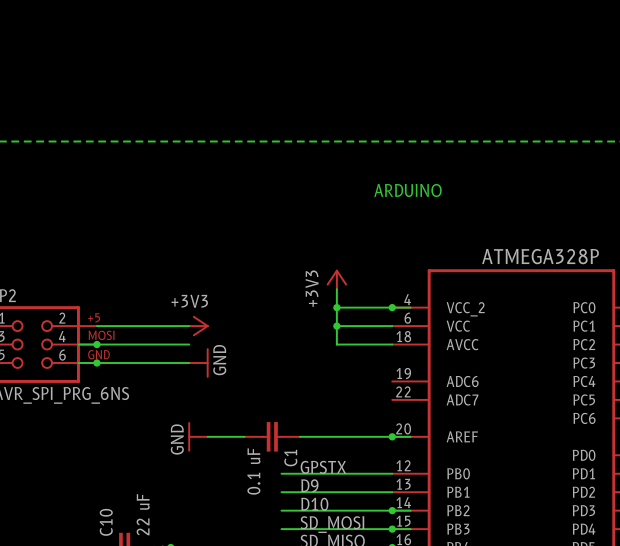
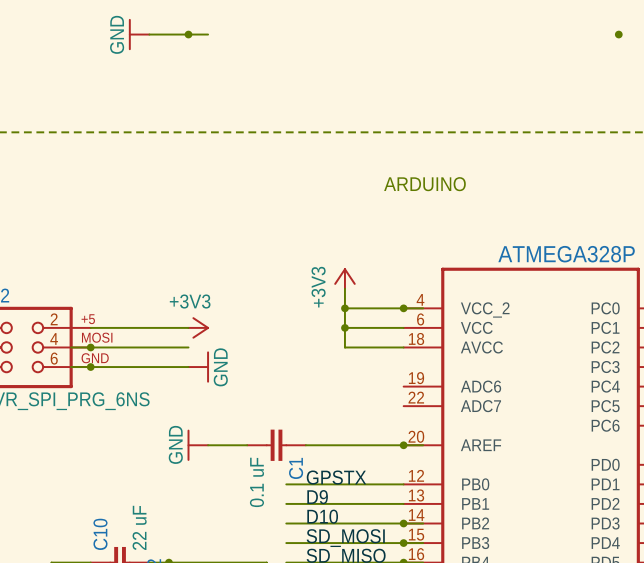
power symbol: none -> GND (139, 34)
wire: none -> (149, 34) (208, 34)
junction: none -> (188, 34)
junction: none -> (618, 34)

